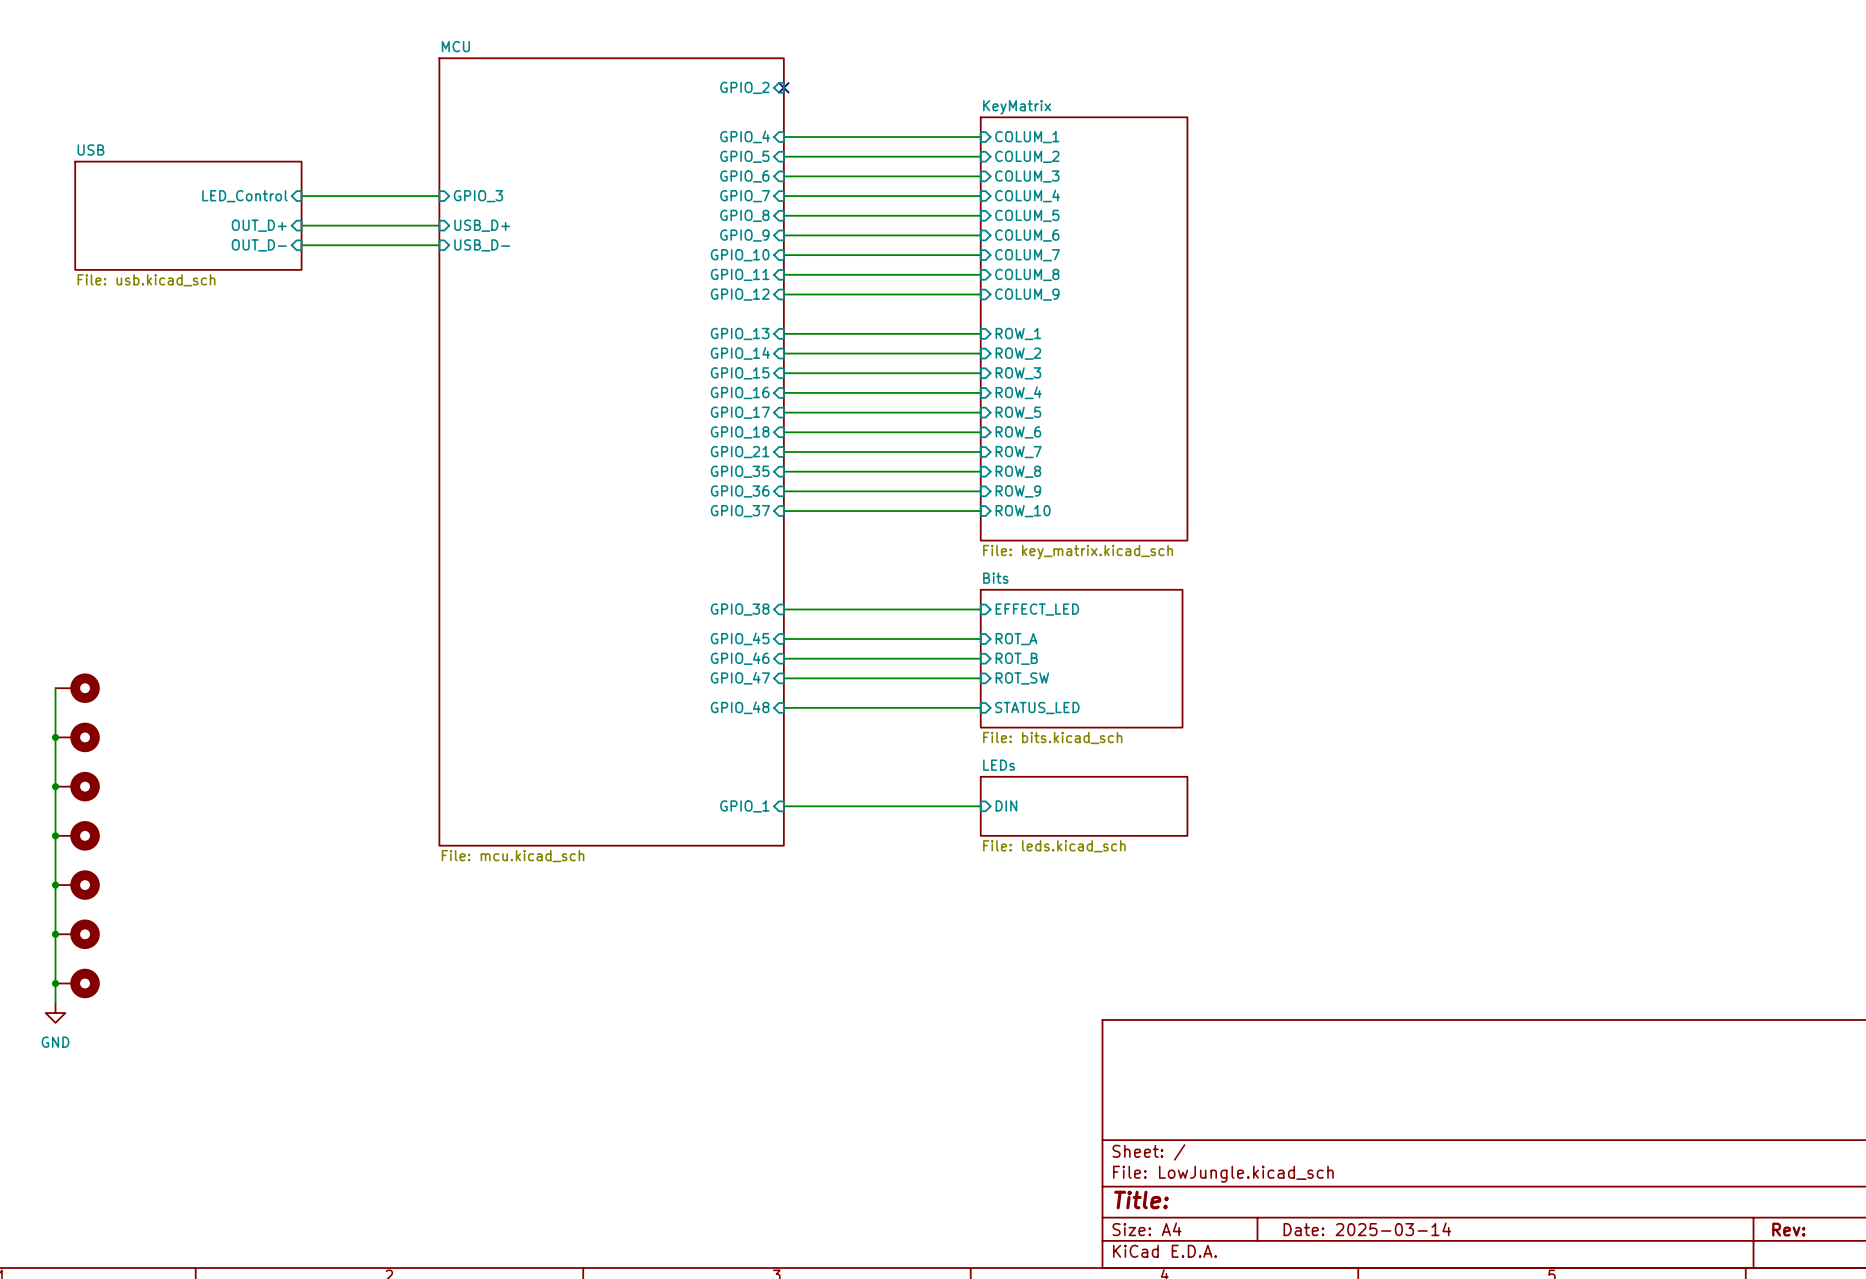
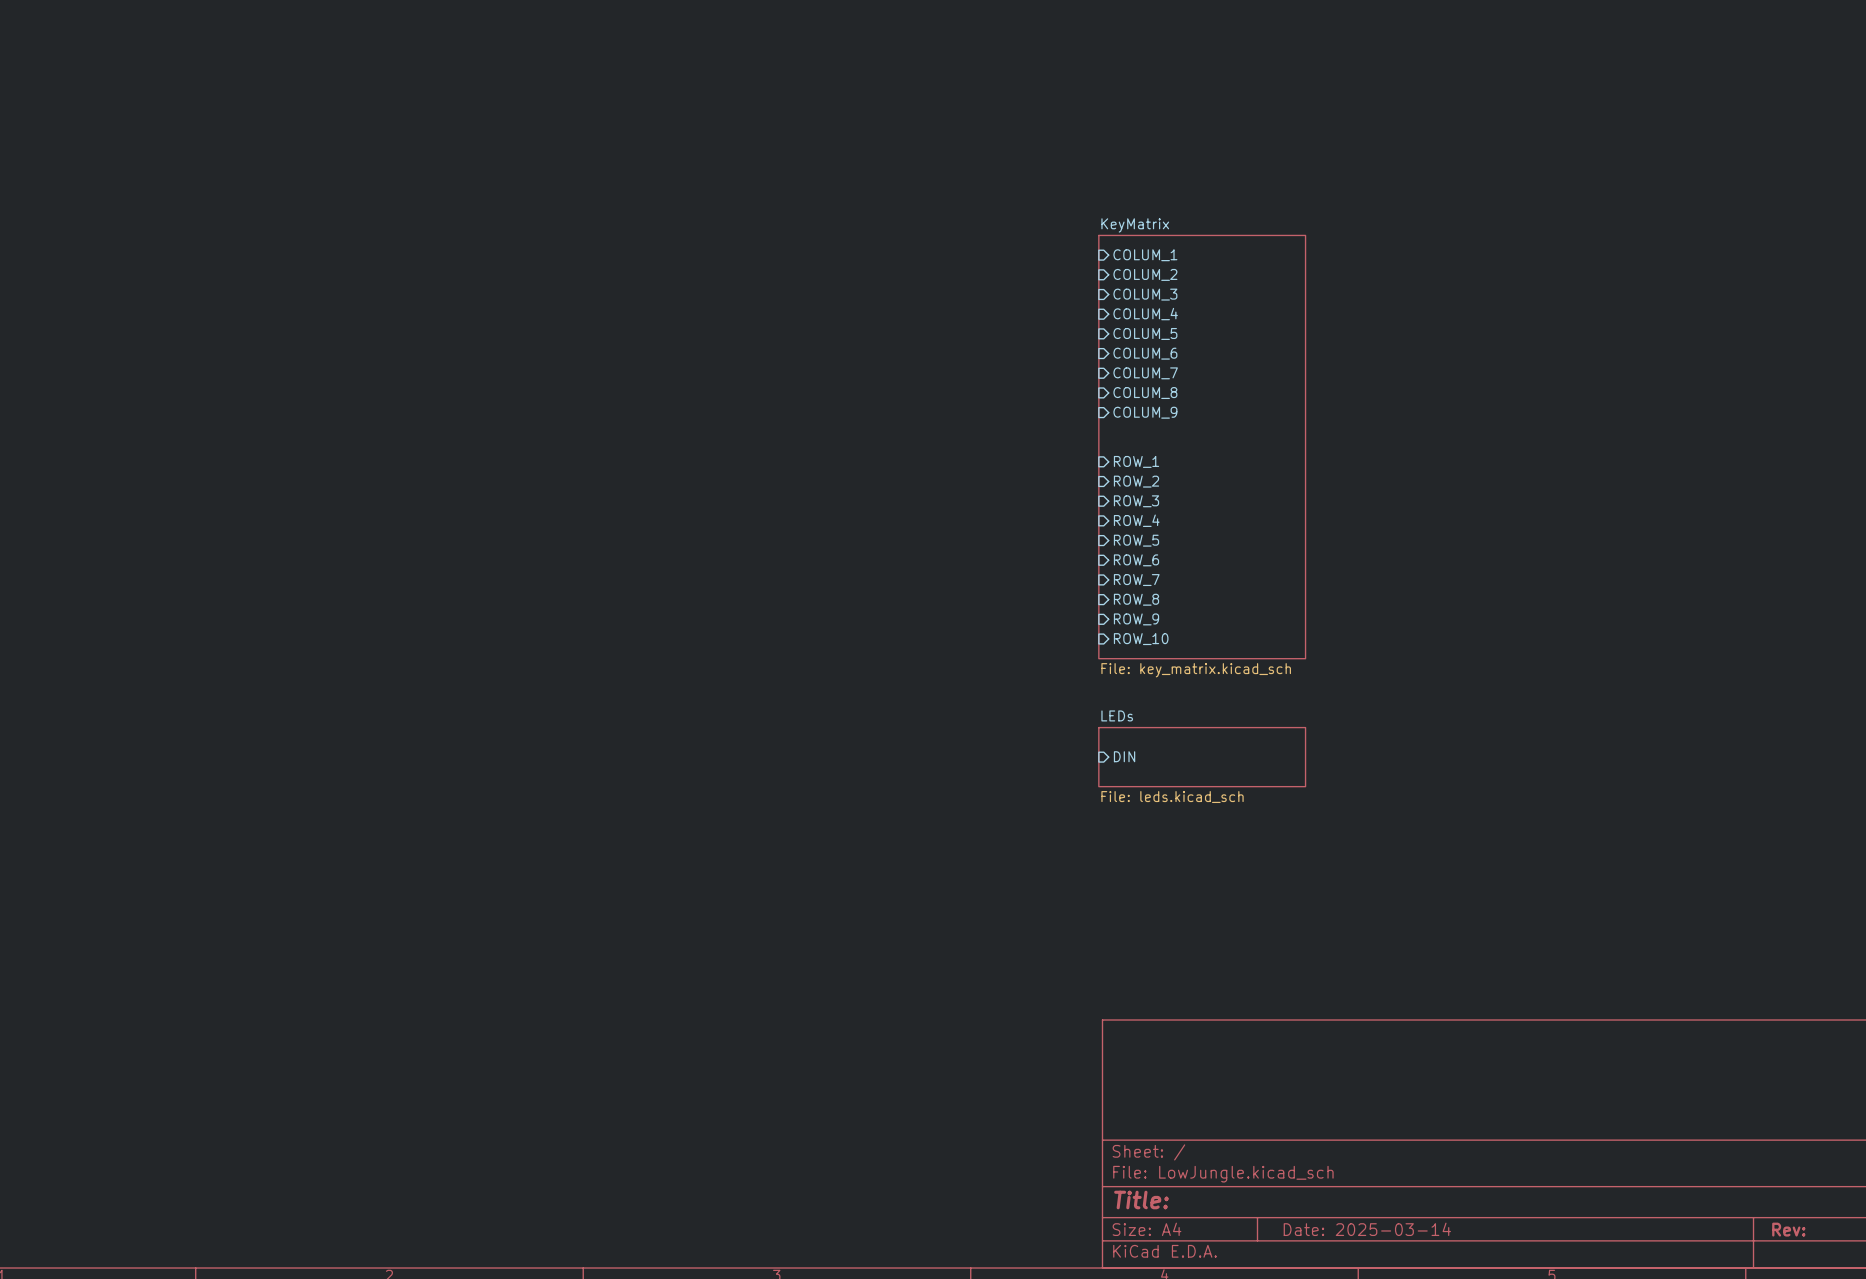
sheet pin: GPIO_2 (744, 87) -> none
no-connect mark: (783, 87) -> none
sheet pin: GPIO_4 (745, 136) -> none
wire: (783, 137) (980, 137) -> none
sheet pin position: COLUM_1 (1027, 137) -> COLUM_1 (1145, 255)
sheet pin: GPIO_5 (744, 156) -> none
wire: (783, 156) (980, 156) -> none
sheet pin position: COLUM_2 (1027, 156) -> COLUM_2 (1145, 274)
sheet pin: GPIO_6 (744, 176) -> none
wire: (783, 176) (980, 176) -> none
sheet pin position: COLUM_3 (1027, 176) -> COLUM_3 (1145, 294)
sheet pin position: COLUM_4 (1027, 195) -> COLUM_4 (1145, 314)
sheet pin: LED_Control (244, 196) -> none
wire: (301, 196) (439, 196) -> none
sheet pin: GPIO_3 (478, 196) -> none
sheet pin: GPIO_7 (745, 196) -> none
wire: (783, 196) (980, 196) -> none
sheet USB: File: usb.kicad_sch (188, 215) -> none
sheet pin: GPIO_8 (744, 215) -> none
wire: (783, 215) (980, 215) -> none
sheet pin position: COLUM_5 (1027, 215) -> COLUM_5 (1145, 333)
sheet pin: OUT_D+ (259, 225) -> none
wire: (301, 225) (439, 225) -> none
sheet pin: USB_D+ (482, 225) -> none
sheet pin: GPIO_9 (744, 235) -> none
wire: (783, 235) (980, 235) -> none
sheet pin position: COLUM_6 (1027, 235) -> COLUM_6 (1145, 353)
sheet pin: OUT_D- (259, 245) -> none
wire: (301, 245) (439, 245) -> none
sheet pin: USB_D- (482, 245) -> none
sheet pin: GPIO_10 (740, 255) -> none
wire: (783, 255) (980, 255) -> none
sheet pin position: COLUM_7 (1027, 255) -> COLUM_7 (1145, 373)
sheet pin: GPIO_11 (740, 274) -> none
wire: (783, 274) (980, 274) -> none
sheet pin position: COLUM_8 (1027, 274) -> COLUM_8 (1145, 393)
sheet pin: GPIO_12 (740, 294) -> none
wire: (783, 294) (980, 294) -> none
sheet pin position: COLUM_9 (1027, 294) -> COLUM_9 (1145, 412)
sheet KeyMatrix position: (1084, 328) -> (1202, 447)
sheet pin: GPIO_13 (740, 333) -> none
wire: (783, 333) (980, 333) -> none
sheet pin position: ROW_1 (1018, 333) -> ROW_1 (1136, 461)
sheet pin: GPIO_14 (740, 353) -> none
wire: (783, 353) (980, 353) -> none
sheet pin position: ROW_2 (1018, 353) -> ROW_2 (1136, 481)
sheet pin: GPIO_15 (740, 373) -> none
wire: (783, 373) (980, 373) -> none
sheet pin position: ROW_3 (1018, 373) -> ROW_3 (1136, 501)
wire: (783, 392) (980, 392) -> none
sheet pin position: ROW_4 (1018, 392) -> ROW_4 (1136, 520)
sheet pin: GPIO_16 (740, 393) -> none
sheet pin: GPIO_17 (740, 412) -> none
wire: (783, 412) (980, 412) -> none
sheet pin position: ROW_5 (1018, 412) -> ROW_5 (1136, 540)
sheet pin: GPIO_18 (740, 432) -> none
wire: (783, 432) (980, 432) -> none
sheet pin position: ROW_6 (1018, 432) -> ROW_6 (1136, 560)
sheet MCU: File: mcu.kicad_sch (611, 451) -> none
wire: (783, 451) (980, 451) -> none
sheet pin: GPIO_21 (740, 452) -> none
sheet pin position: ROW_7 (1018, 452) -> ROW_7 (1136, 580)
sheet pin: GPIO_35 (740, 471) -> none
wire: (783, 471) (980, 471) -> none
sheet pin position: ROW_8 (1018, 471) -> ROW_8 (1136, 599)
sheet pin: GPIO_36 (740, 491) -> none
wire: (783, 491) (980, 491) -> none
sheet pin position: ROW_9 (1018, 491) -> ROW_9 (1136, 619)
sheet pin: GPIO_37 (740, 511) -> none
wire: (783, 511) (980, 511) -> none
sheet pin position: ROW_10 (1023, 511) -> ROW_10 (1141, 639)
sheet pin: GPIO_38 (740, 609) -> none
wire: (783, 609) (980, 609) -> none
sheet pin: EFFECT_LED (1037, 609) -> none
sheet pin: GPIO_45 (740, 638) -> none
wire: (783, 639) (980, 639) -> none
sheet pin: ROT_A (1016, 639) -> none
sheet pin: GPIO_46 (740, 658) -> none
wire: (783, 658) (980, 658) -> none
sheet pin: ROT_B (1016, 658) -> none
sheet Bits: File: bits.kicad_sch (1081, 658) -> none
sheet pin: GPIO_47 (740, 678) -> none
wire: (783, 678) (980, 678) -> none
sheet pin: ROT_SW (1022, 678) -> none
wire: (55, 688) (55, 1003) -> none
part: (77, 688) -> none
sheet pin: GPIO_48 (740, 707) -> none
wire: (783, 707) (980, 707) -> none
sheet pin: STATUS_LED (1037, 708) -> none
junction: (55, 737) -> none
part: (77, 737) -> none
junction: (55, 786) -> none
part: (77, 786) -> none
sheet pin position: DIN (1006, 805) -> DIN (1124, 756)
sheet pin: GPIO_1 (744, 806) -> none
wire: (783, 806) (980, 806) -> none
sheet LEDs position: (1084, 806) -> (1202, 757)
junction: (55, 835) -> none
part: (77, 835) -> none
junction: (55, 885) -> none
part: (77, 885) -> none
junction: (55, 934) -> none
part: (77, 934) -> none
junction: (55, 983) -> none
part: (77, 983) -> none
power symbol: GND (55, 1013) -> none

